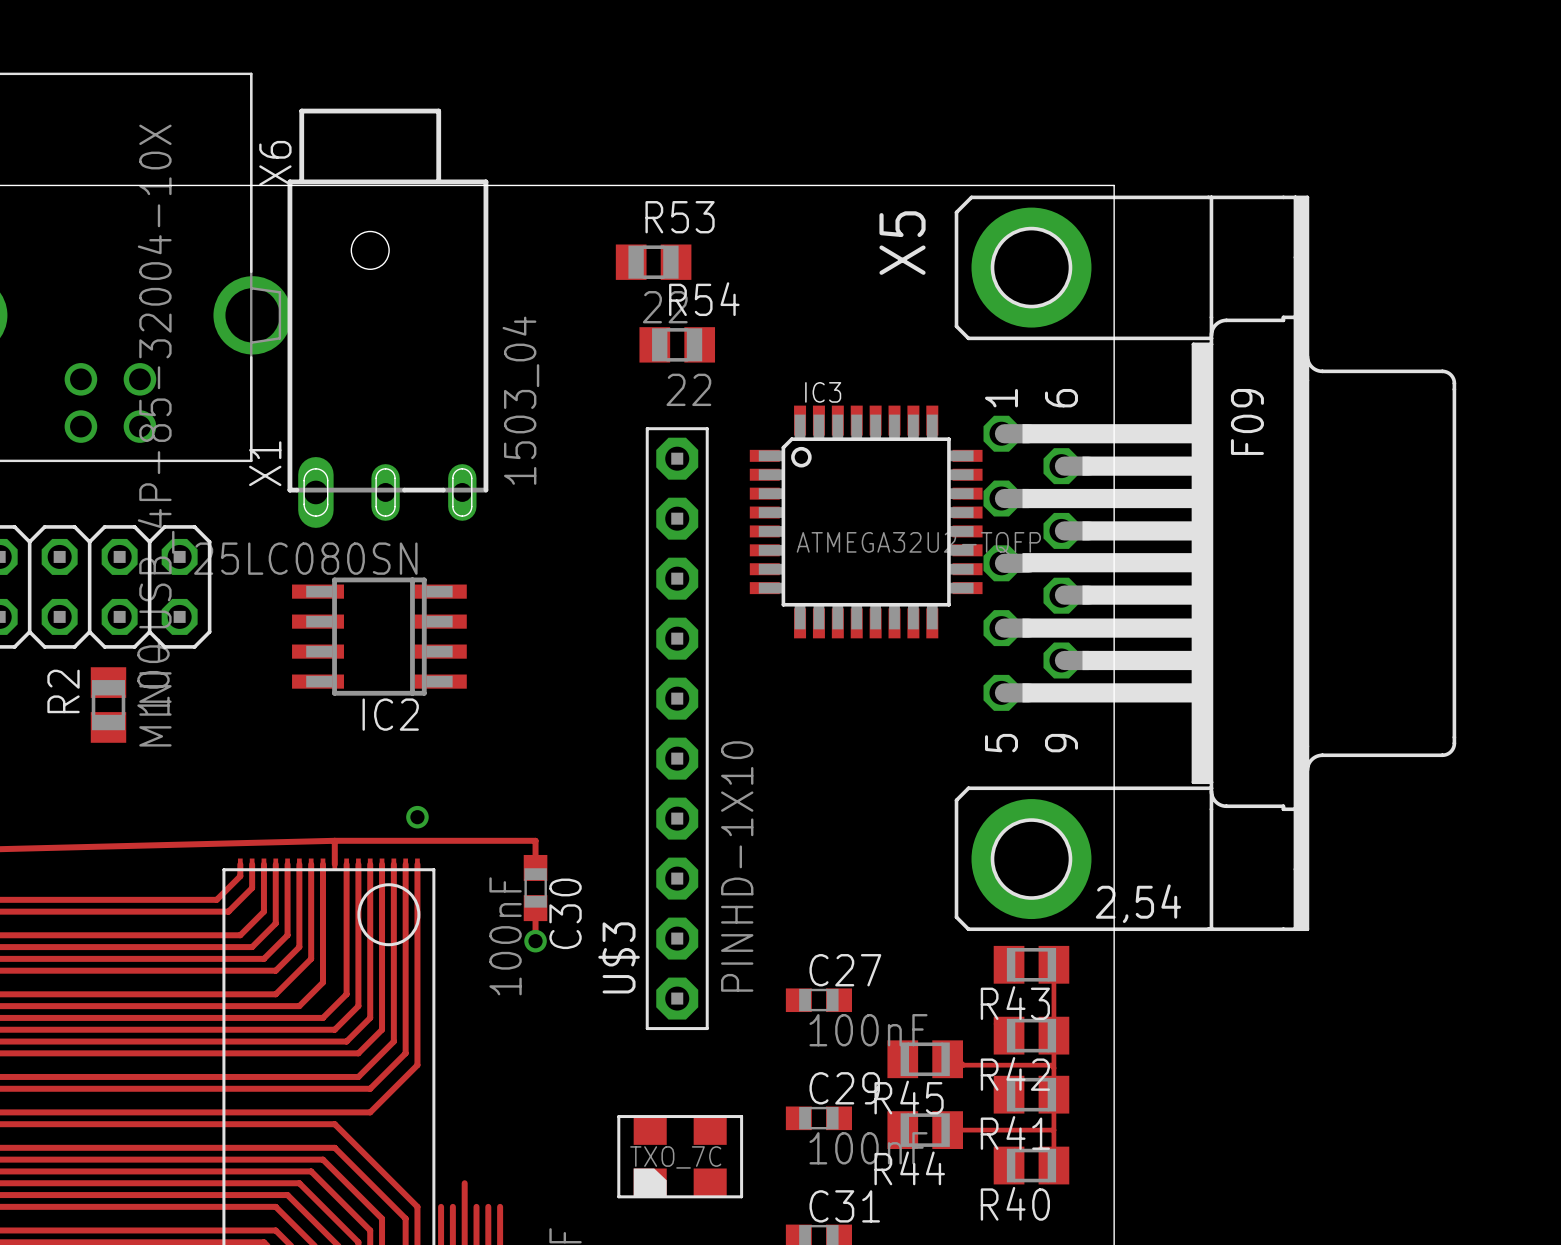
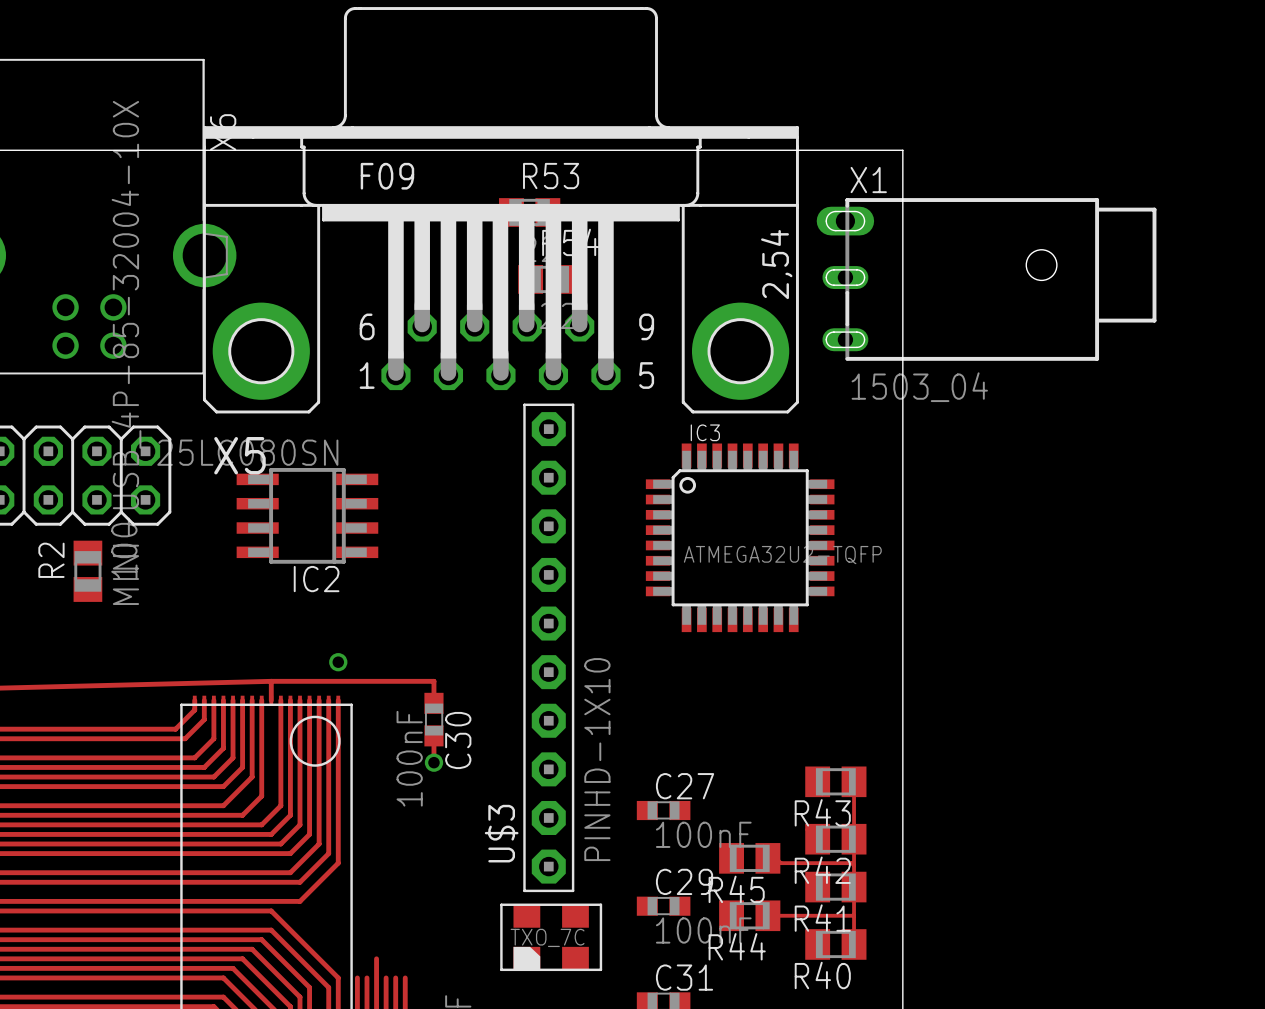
X5 footprint: [954, 195, 1457, 932] -> [202, 7, 799, 414]
X5 name position: X5 (902, 243) -> X5 (239, 455)
X1 rotation: 0° (387, 318) -> 90° clockwise (986, 279)
X1 position: (387, 318) -> (986, 279)
IC3 position: (866, 521) -> (740, 537)
U$3 position: (677, 728) -> (548, 647)

